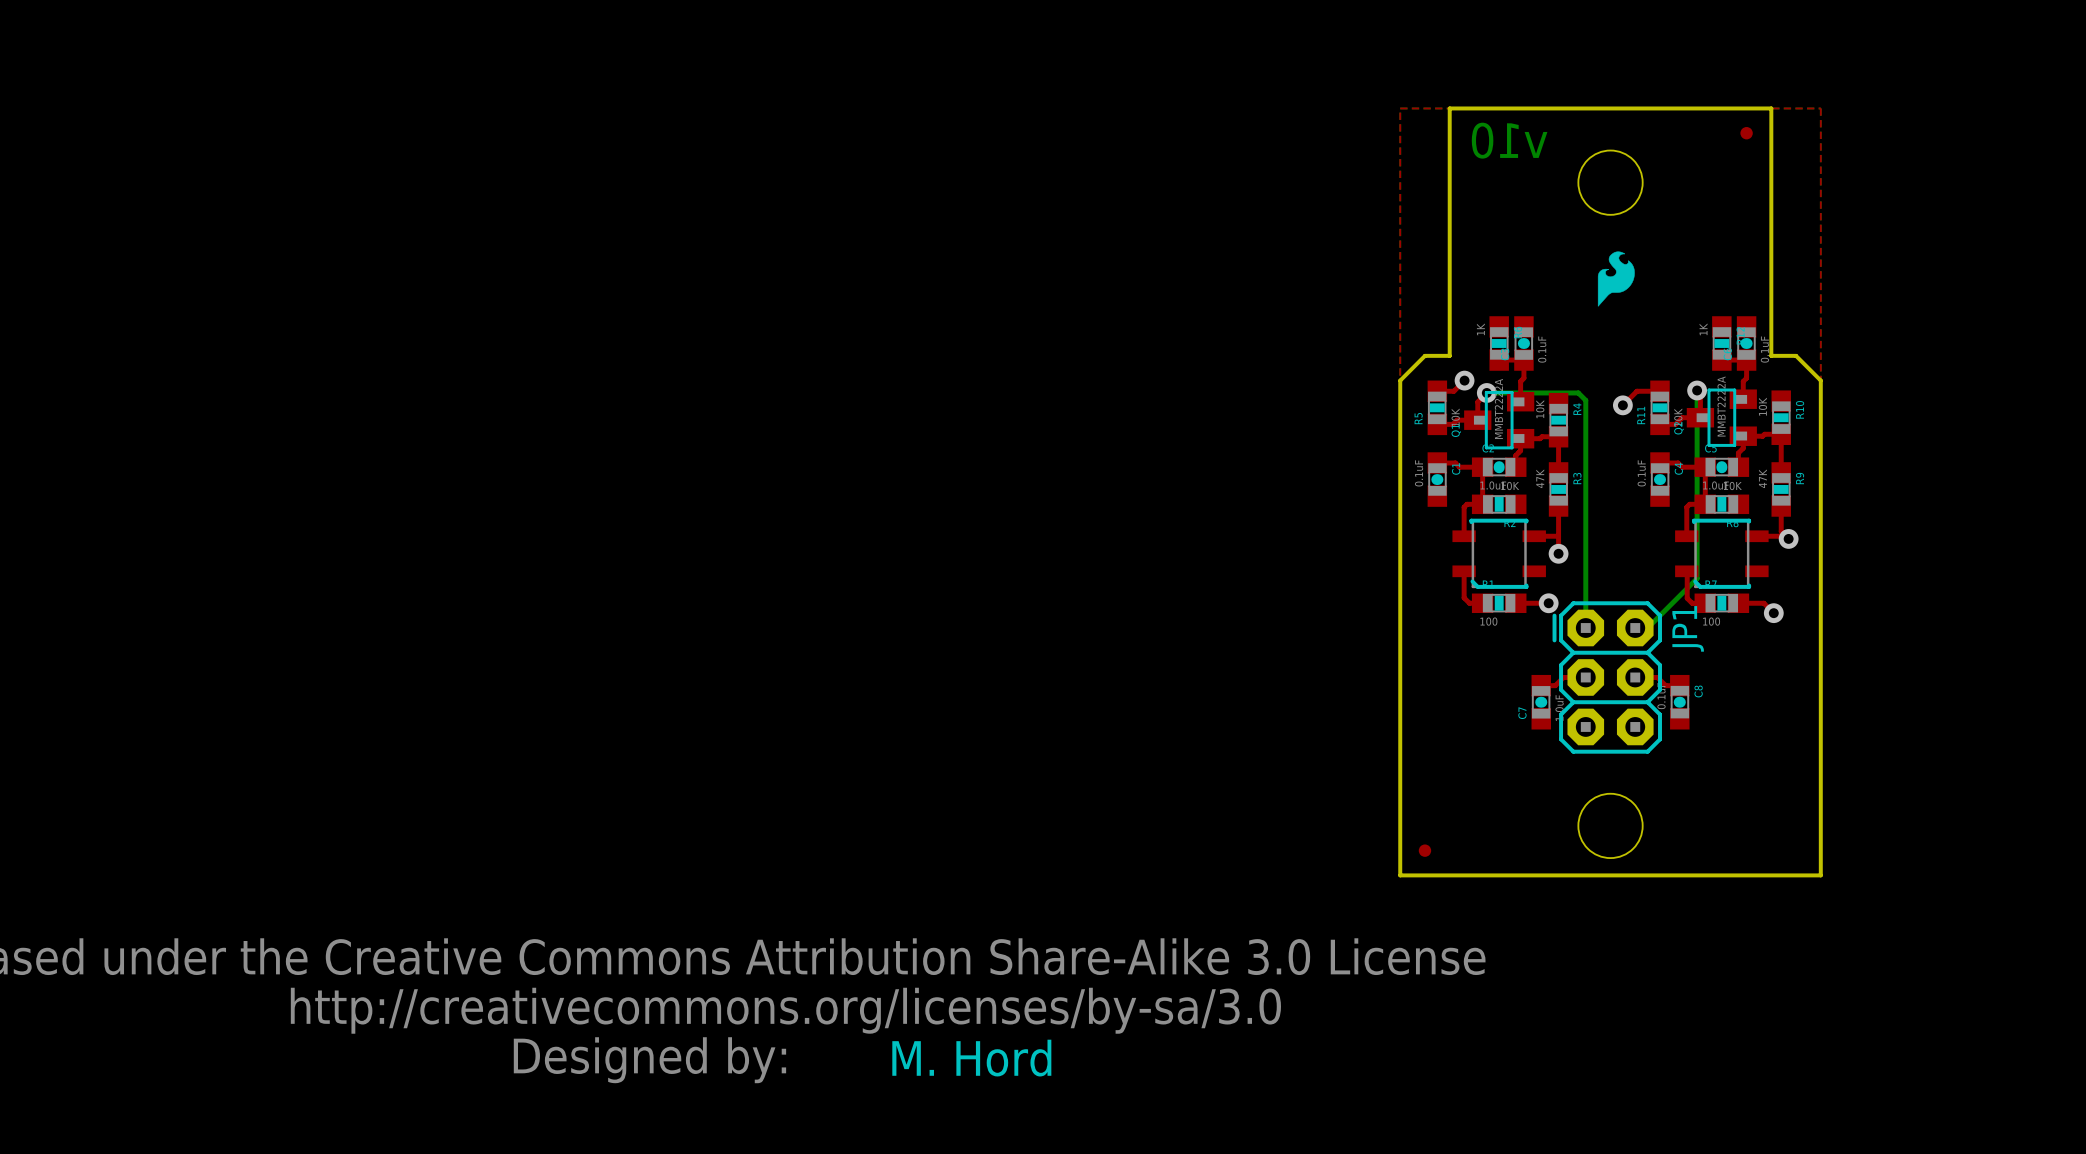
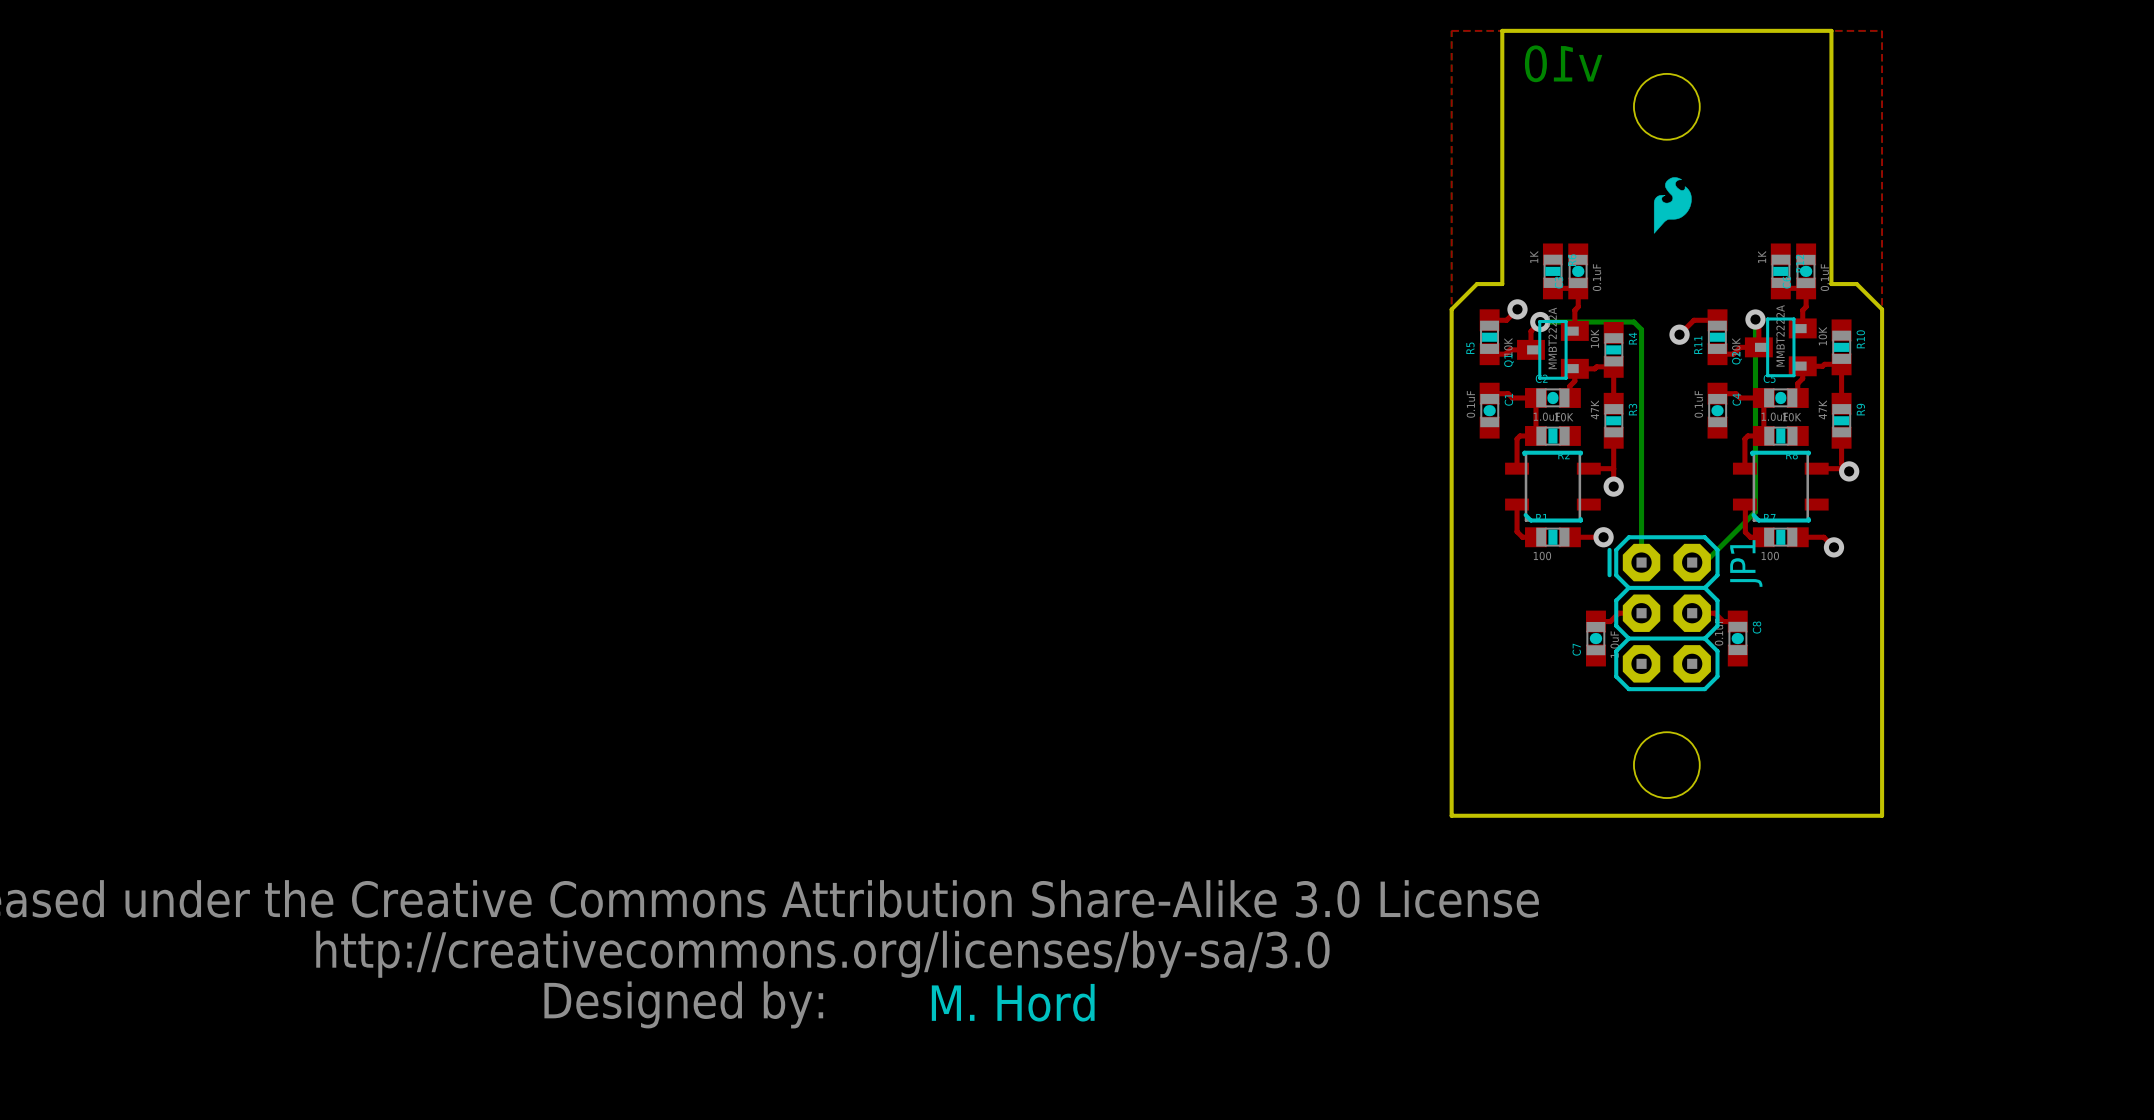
part: (1746, 133) -> none
part: (1424, 850) -> none

